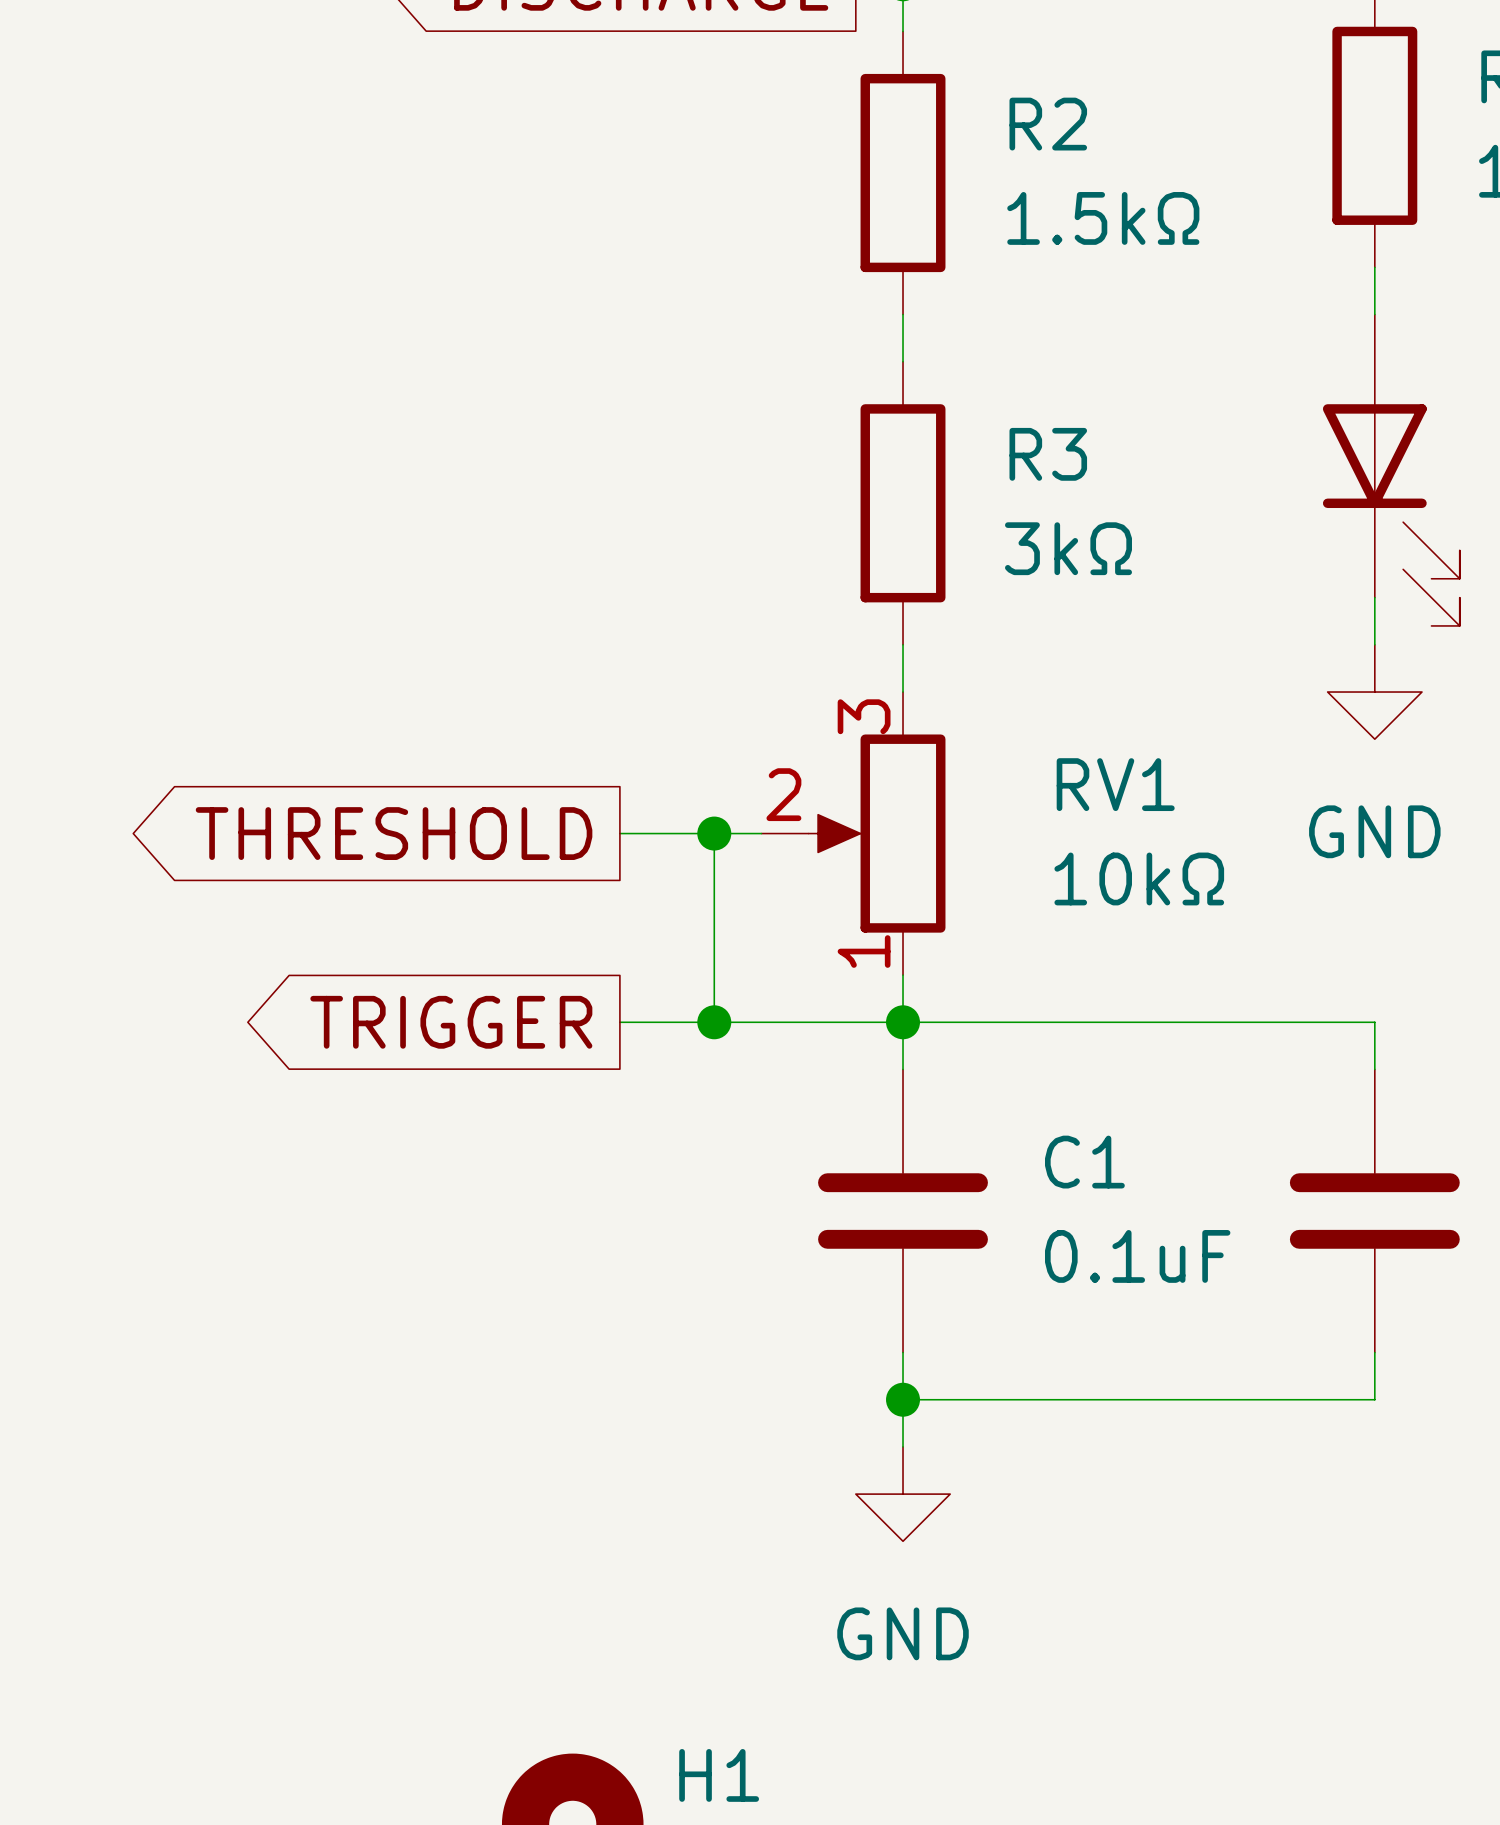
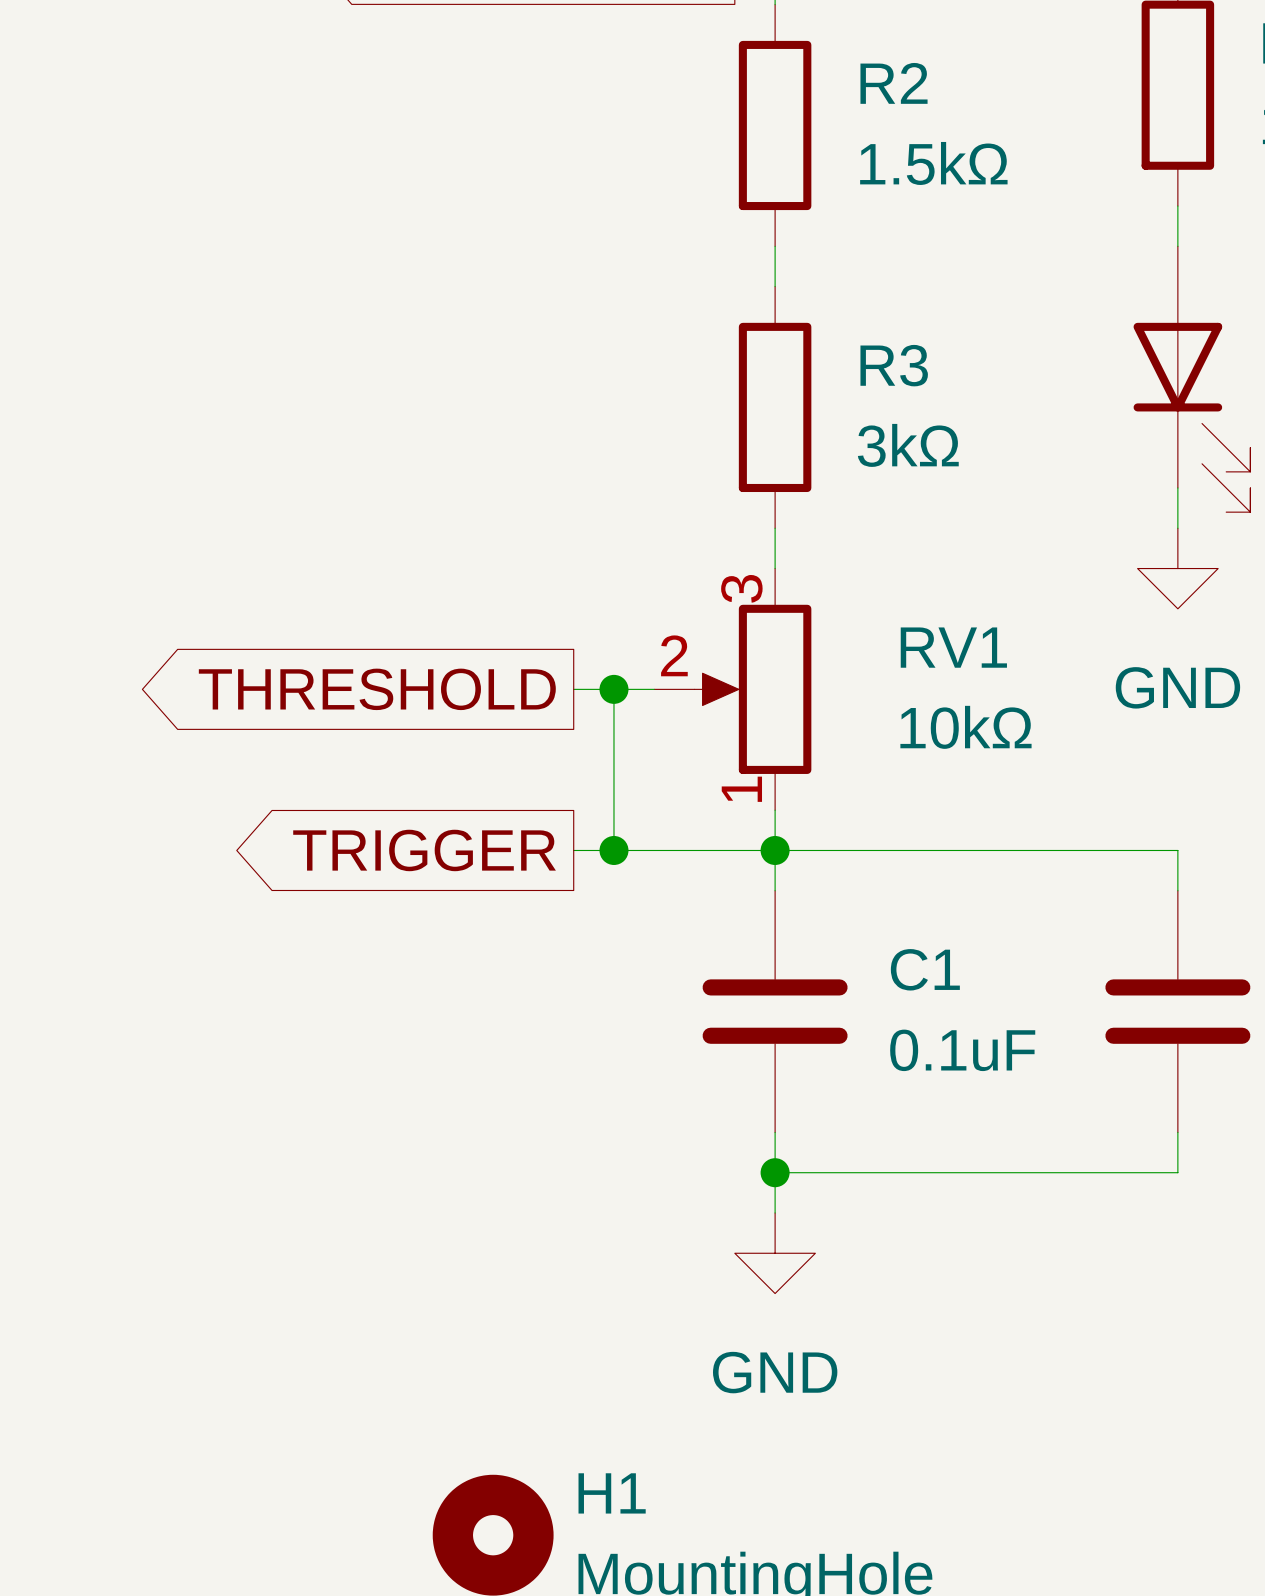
global label position: THRESHOLD (394, 833) -> THRESHOLD (377, 689)
wire: (619, 833) (667, 833) -> none
global label position: TRIGGER (451, 1022) -> TRIGGER (424, 850)
wire: (619, 1022) (667, 1022) -> none

